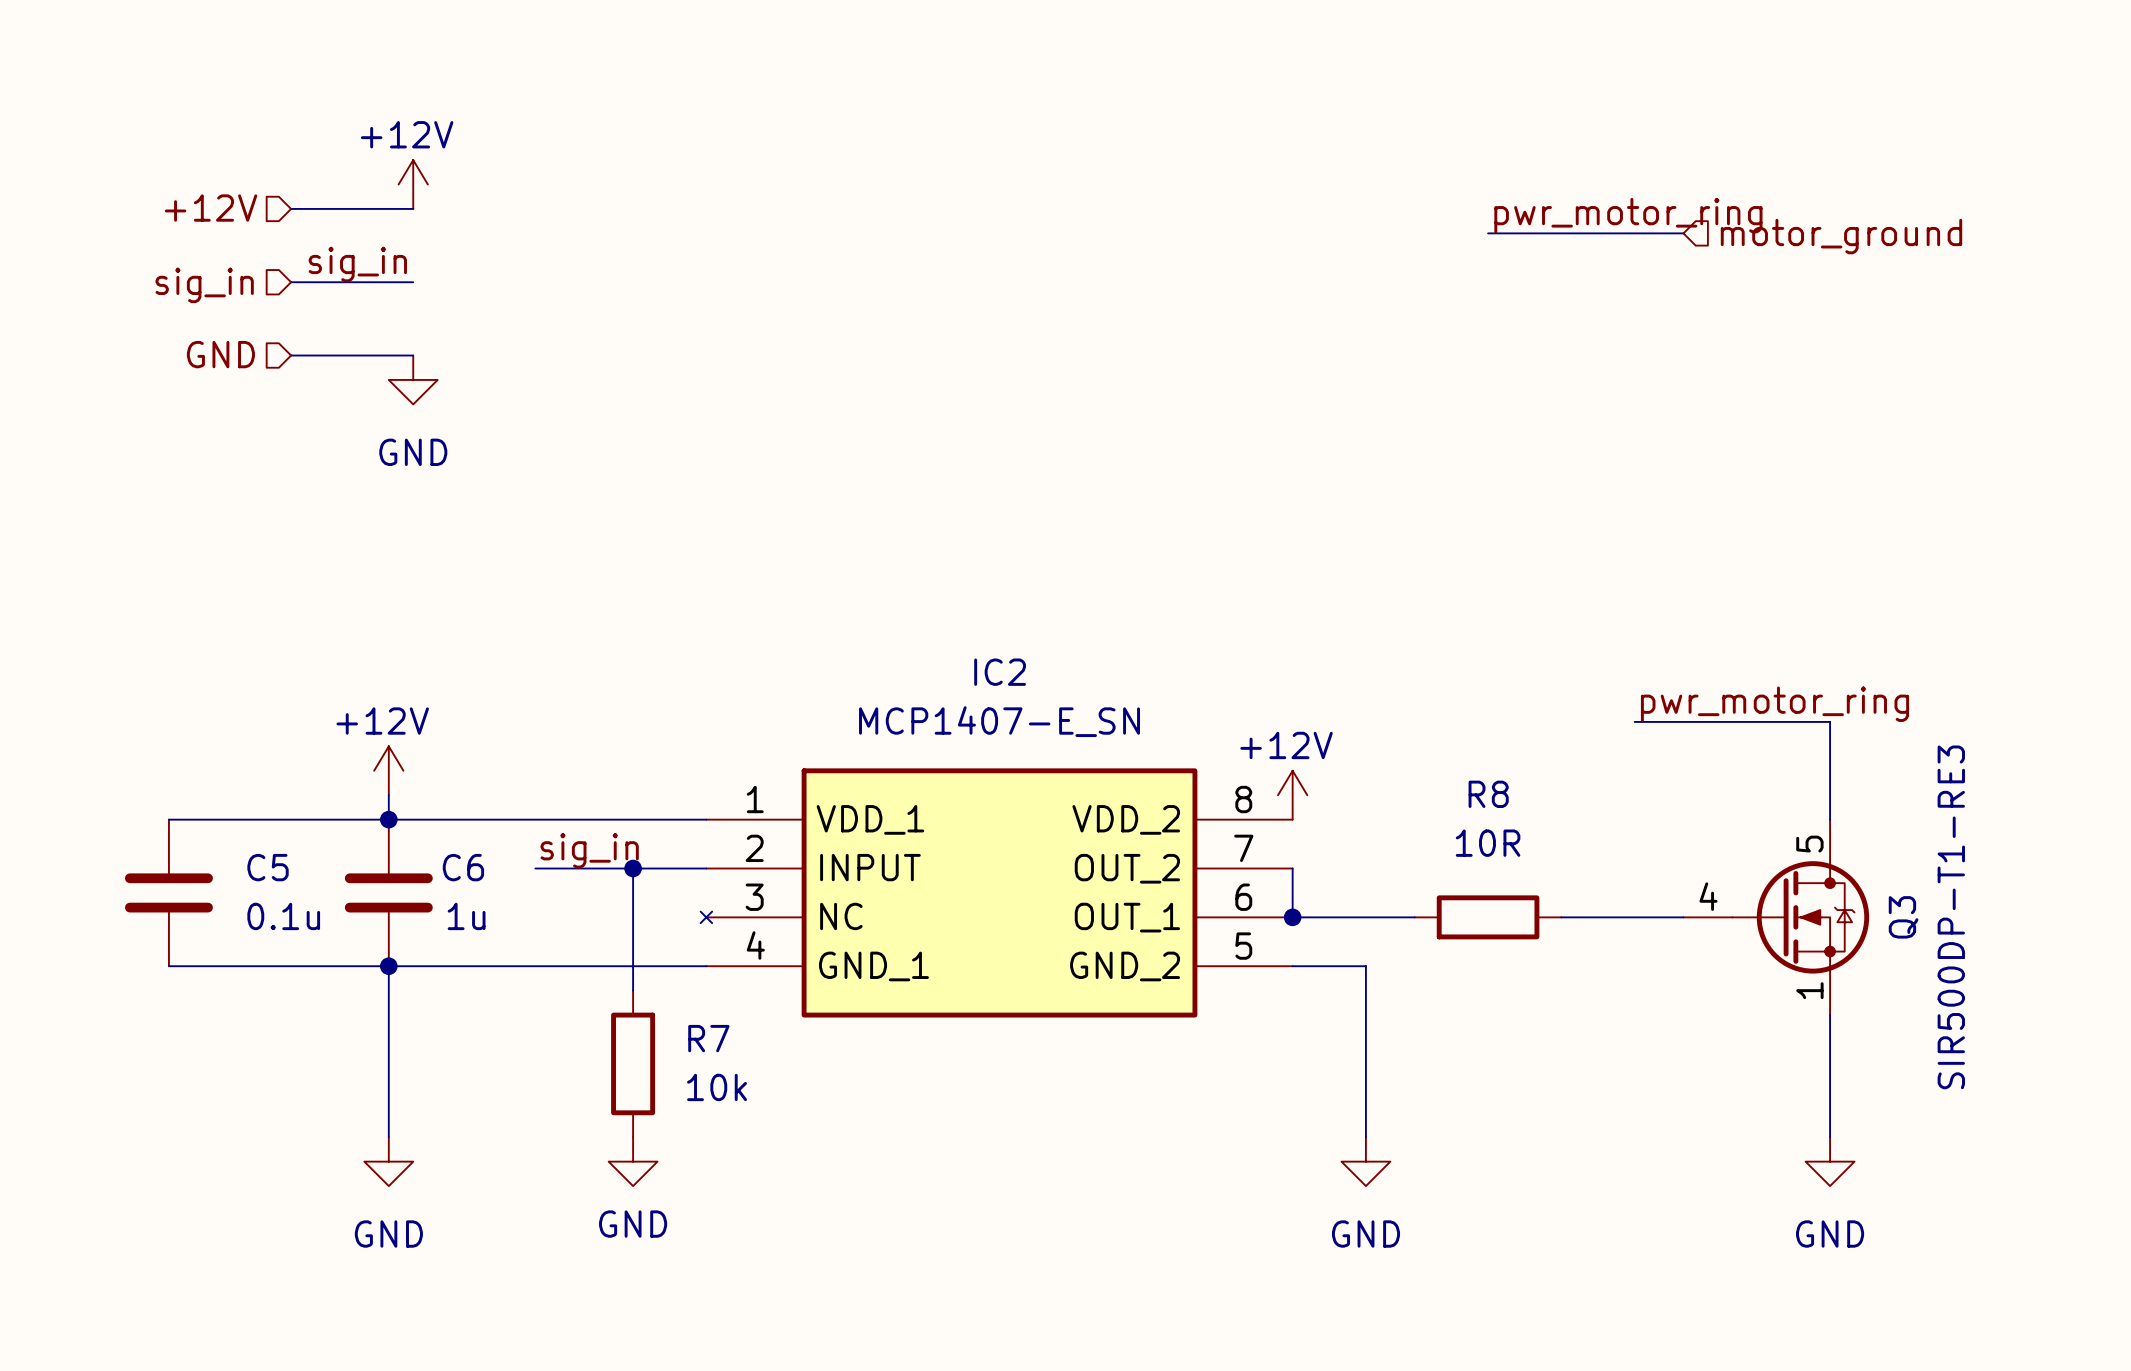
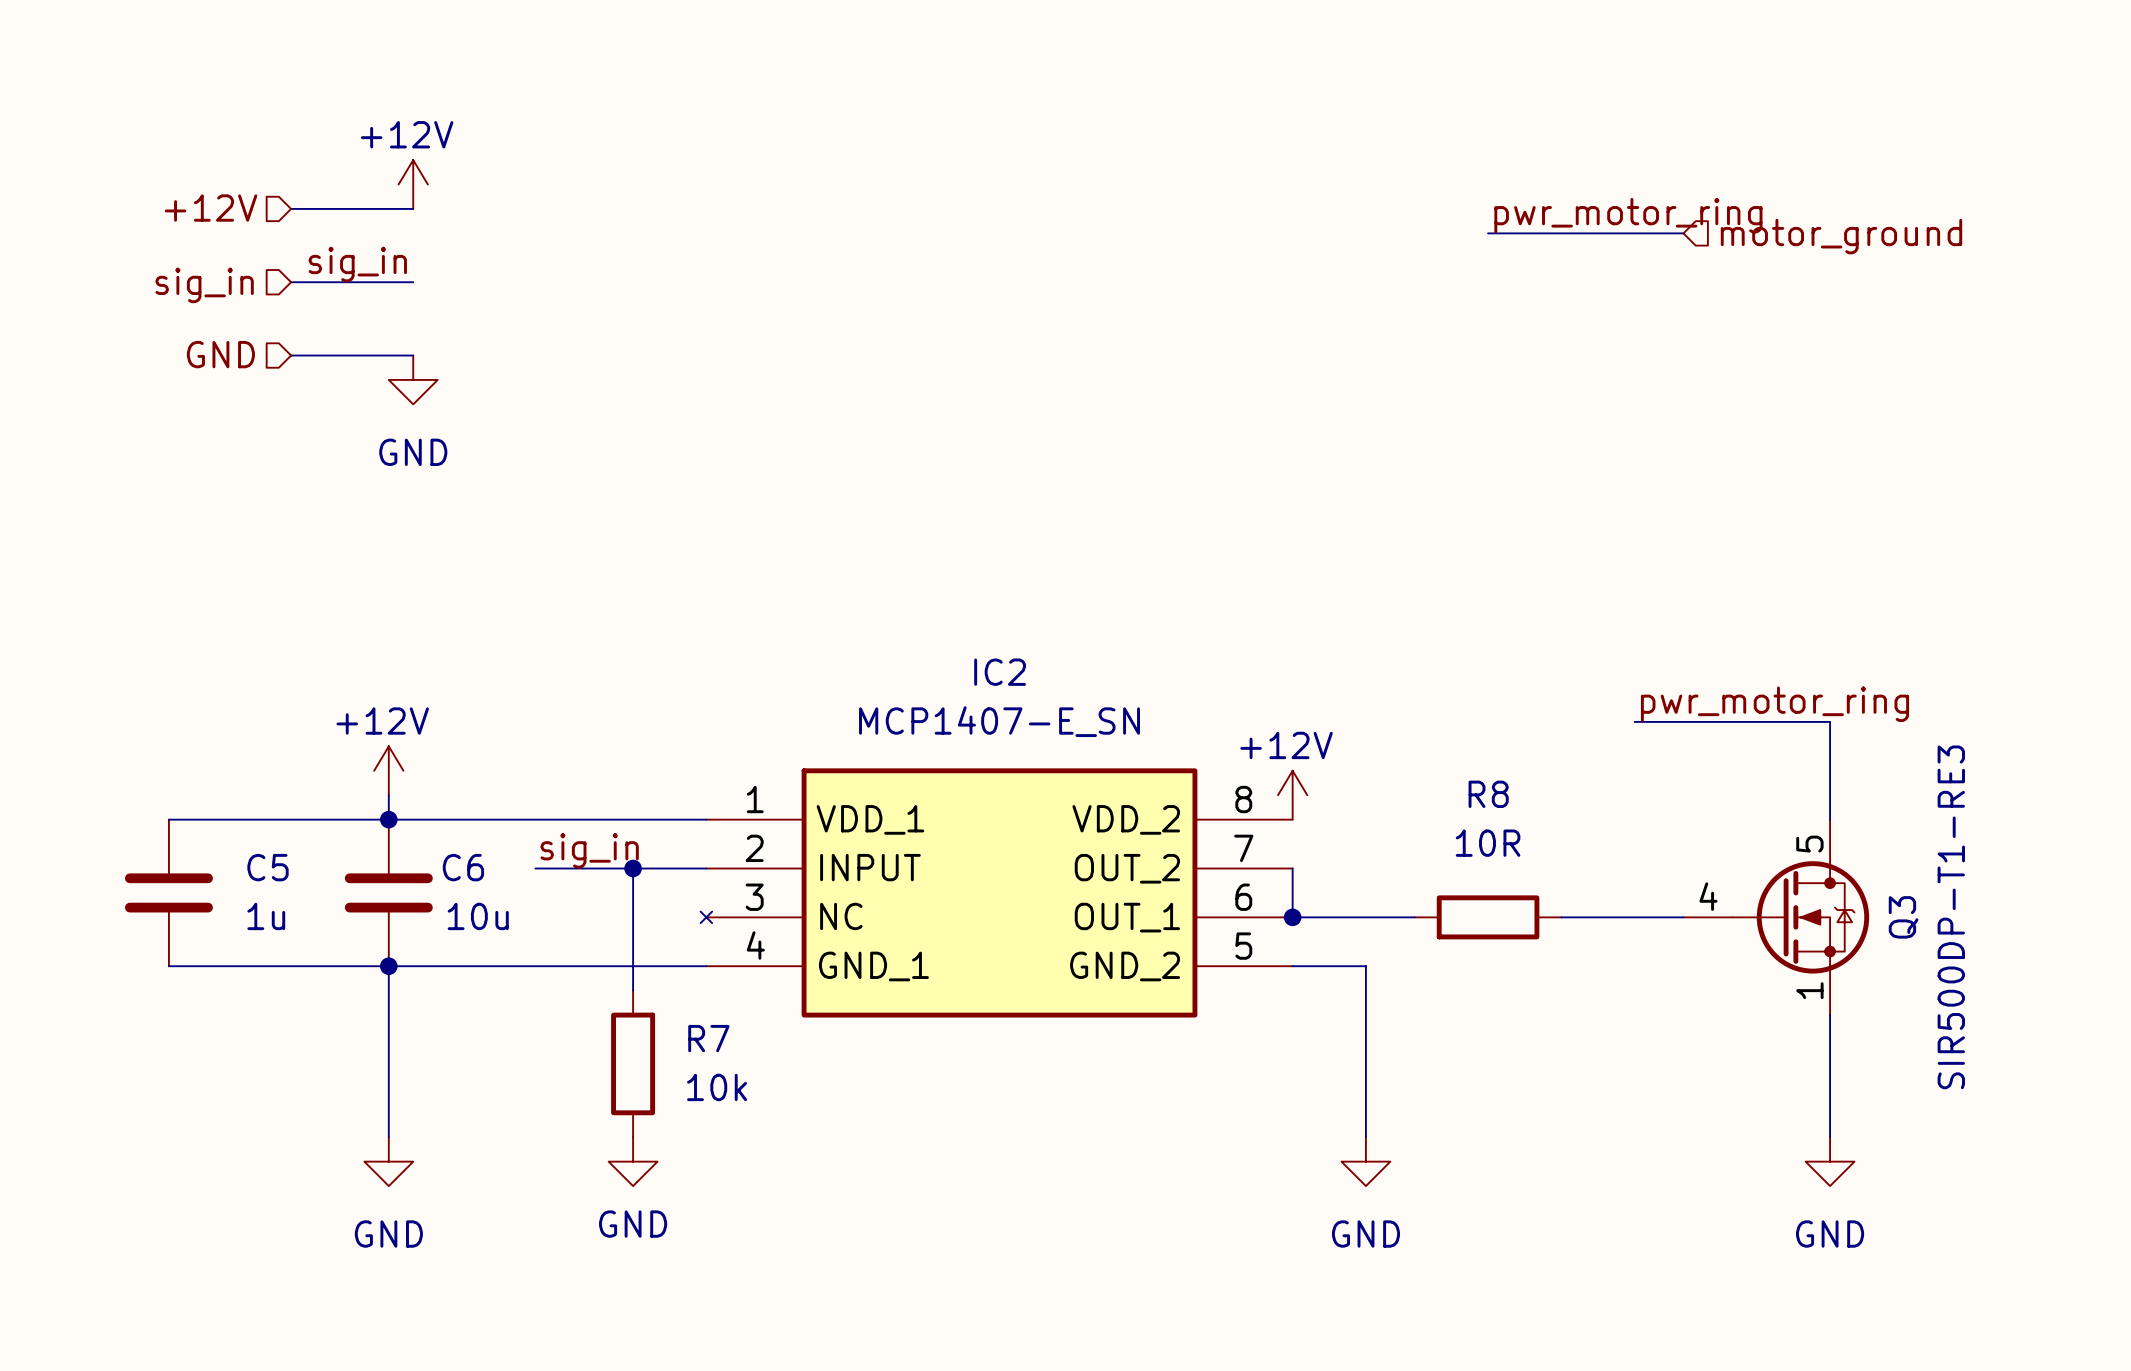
C5 value: 0.1u (283, 916) -> 1u (266, 916)
C6 value: 1u (466, 916) -> 10u (478, 916)

